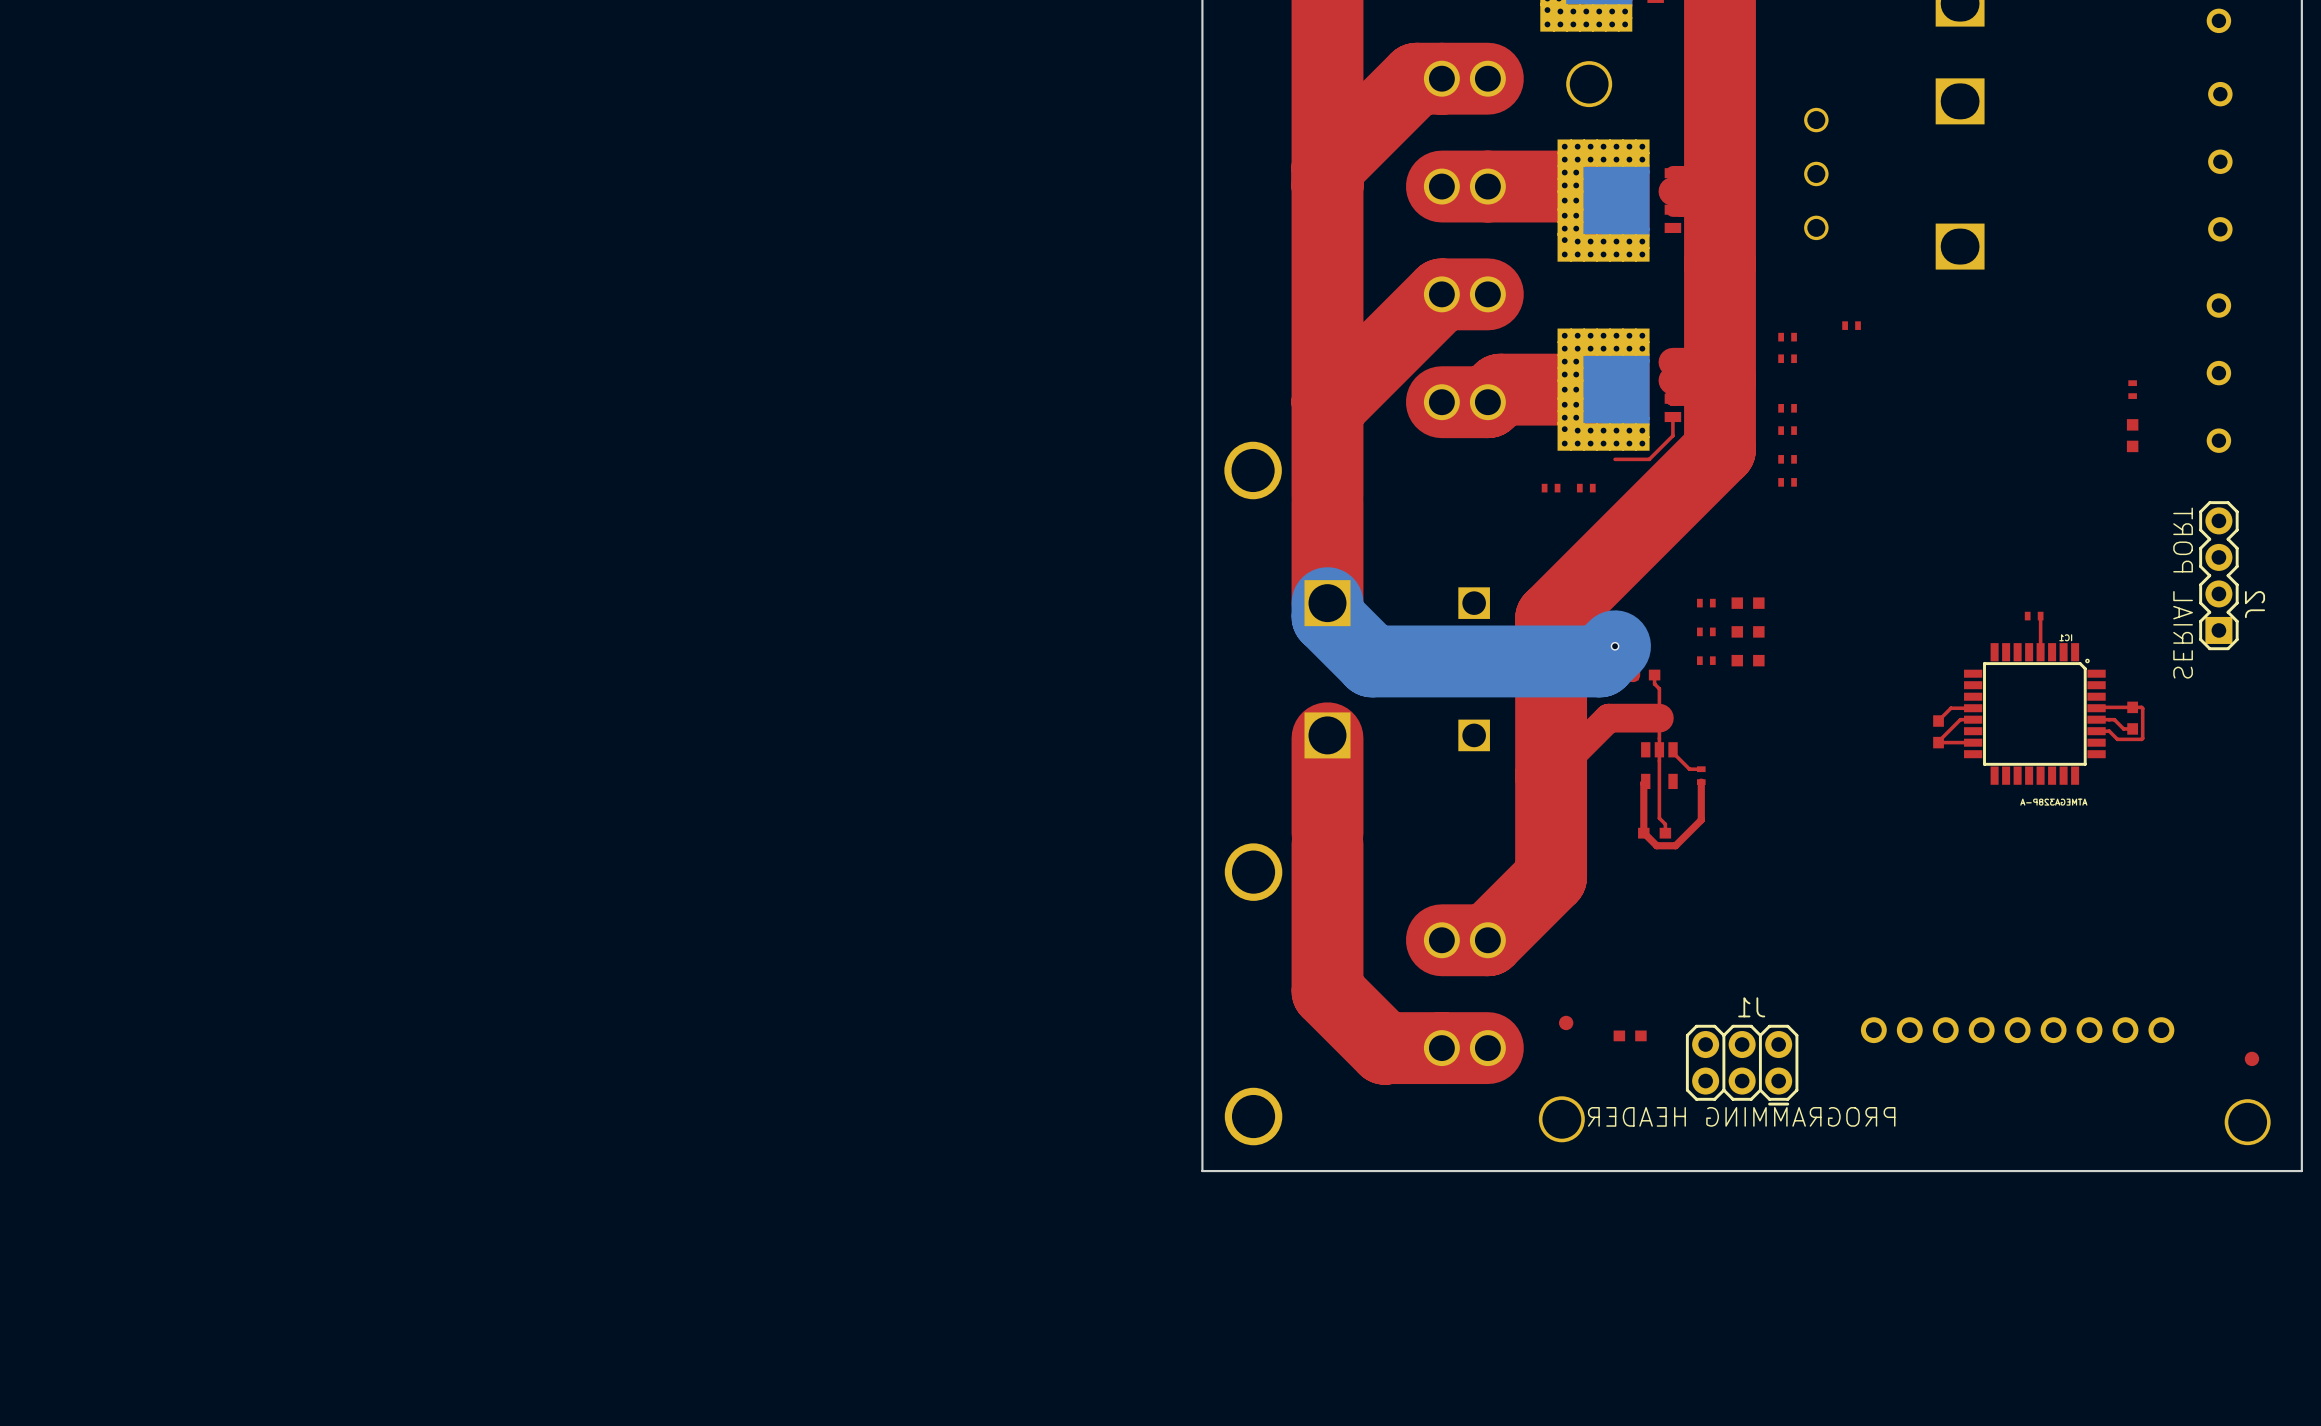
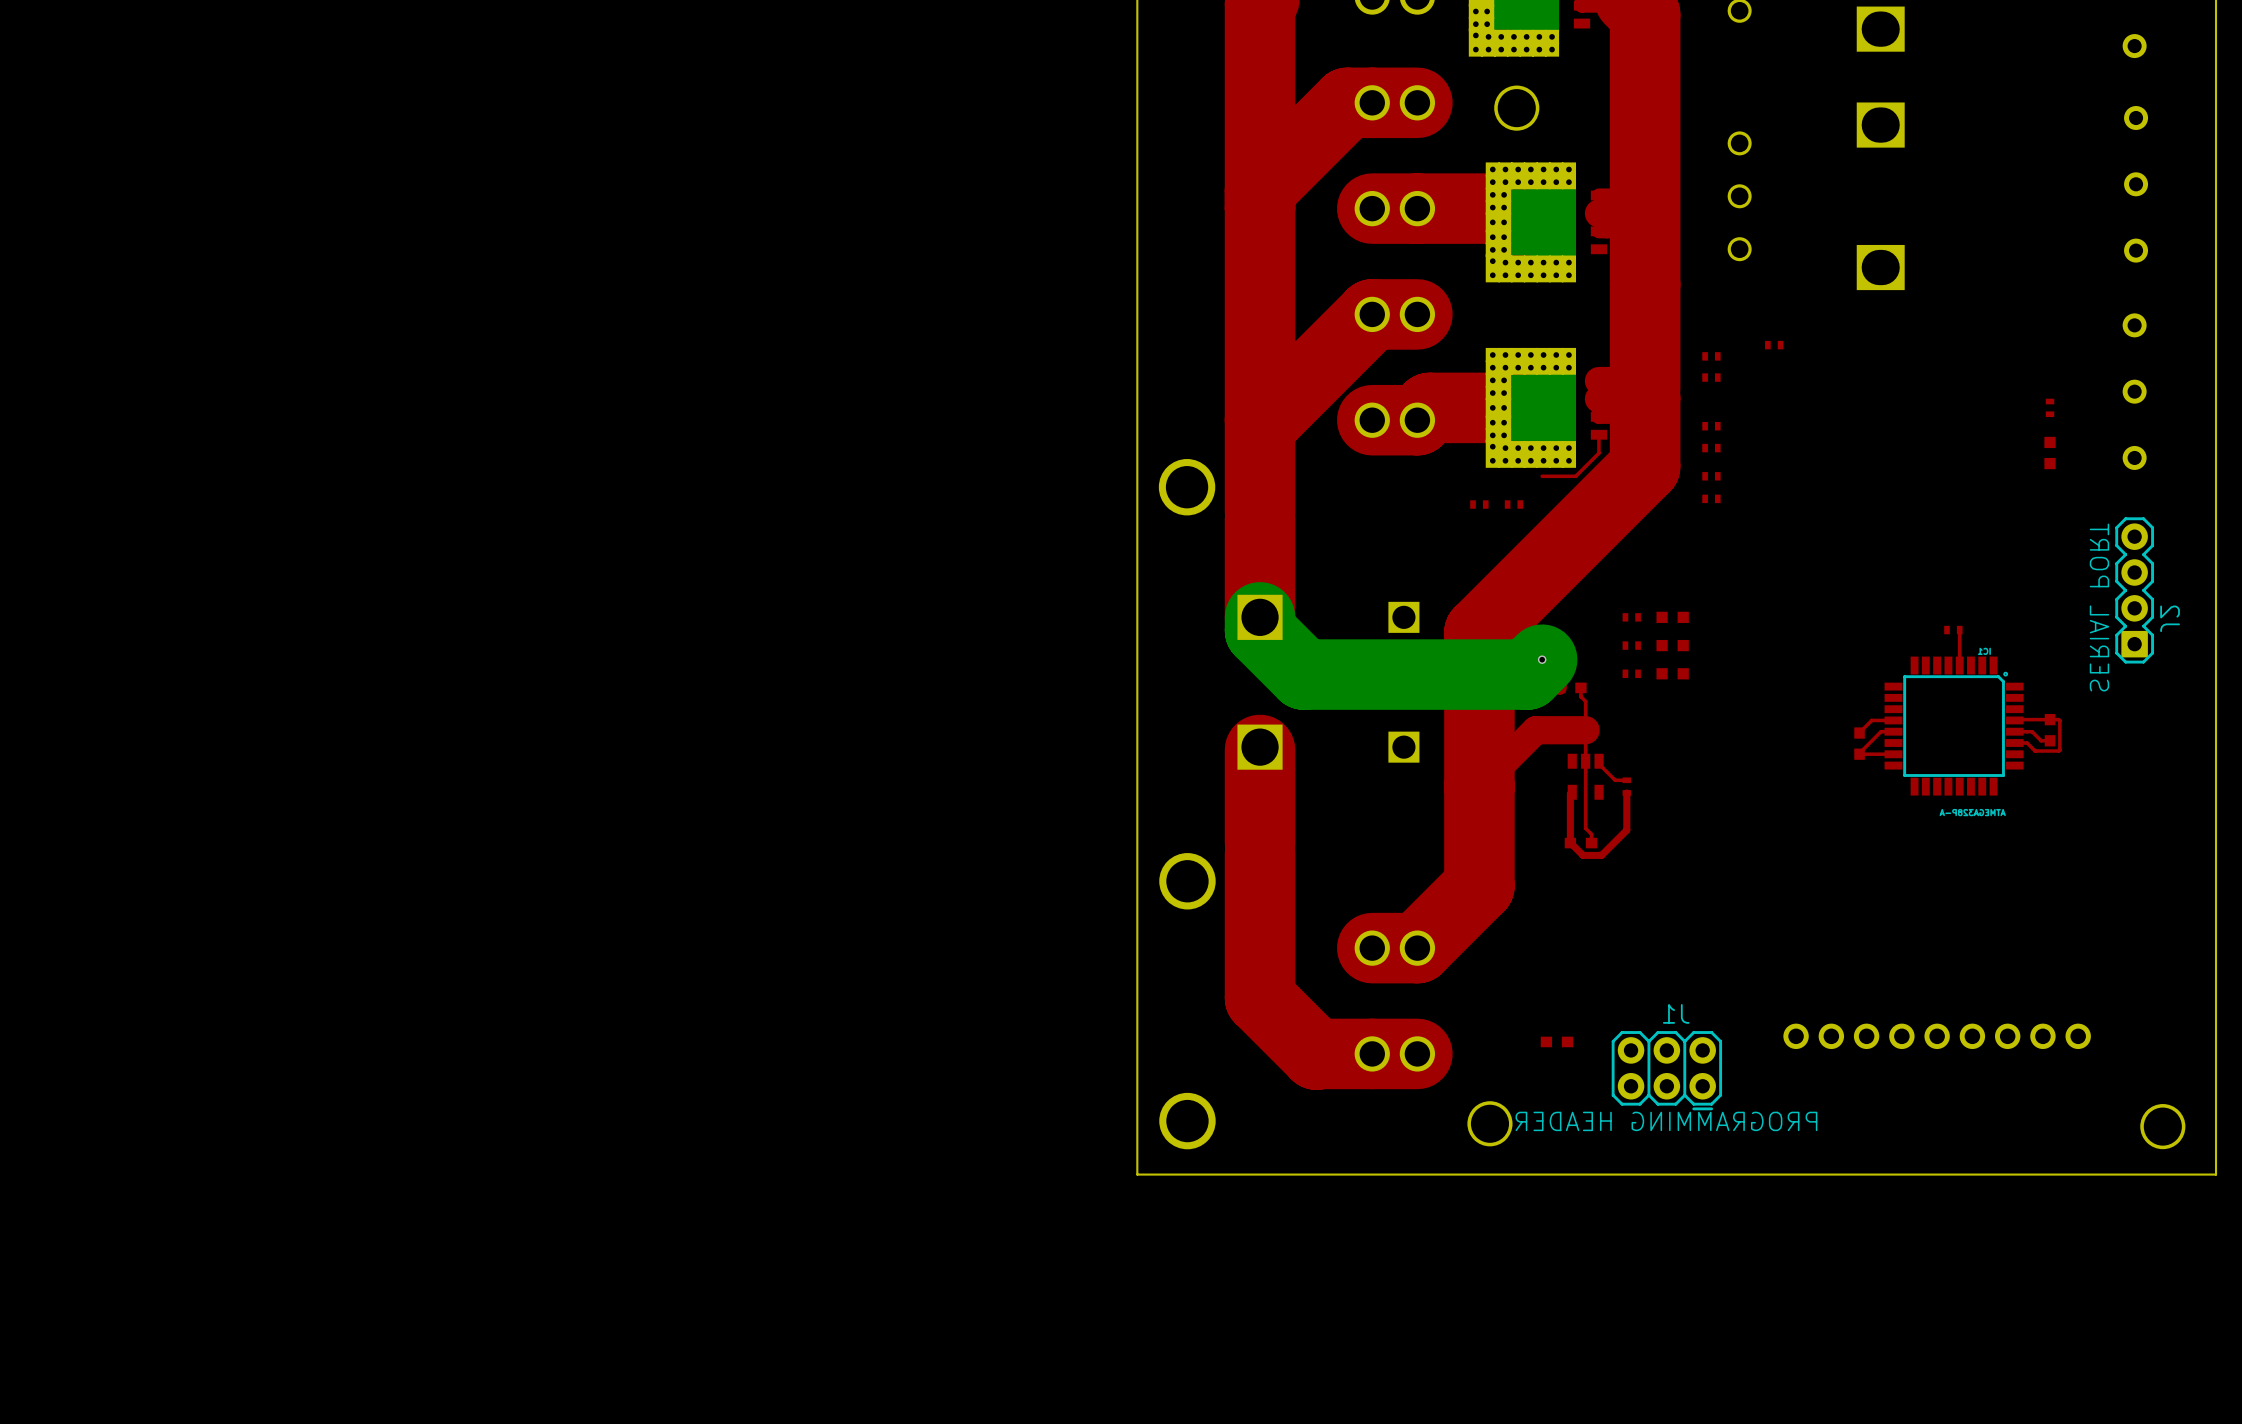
part: (1566, 1022) -> none
part: (2251, 1058) -> none

